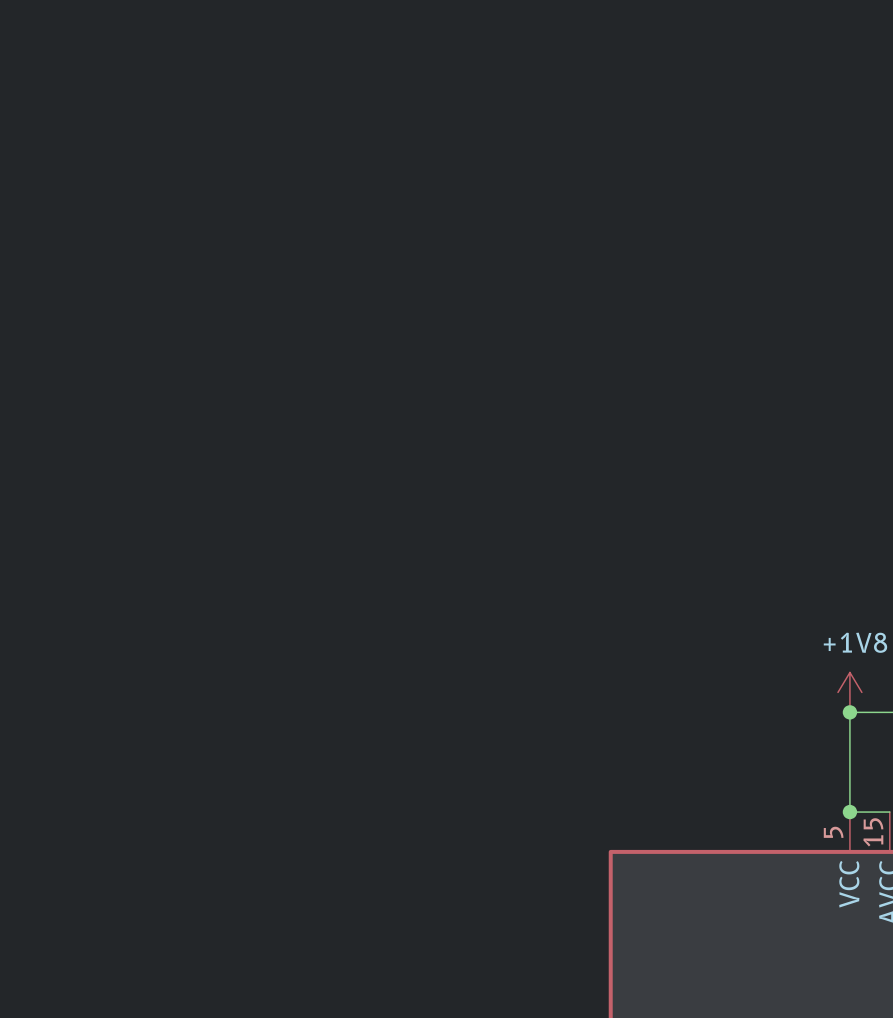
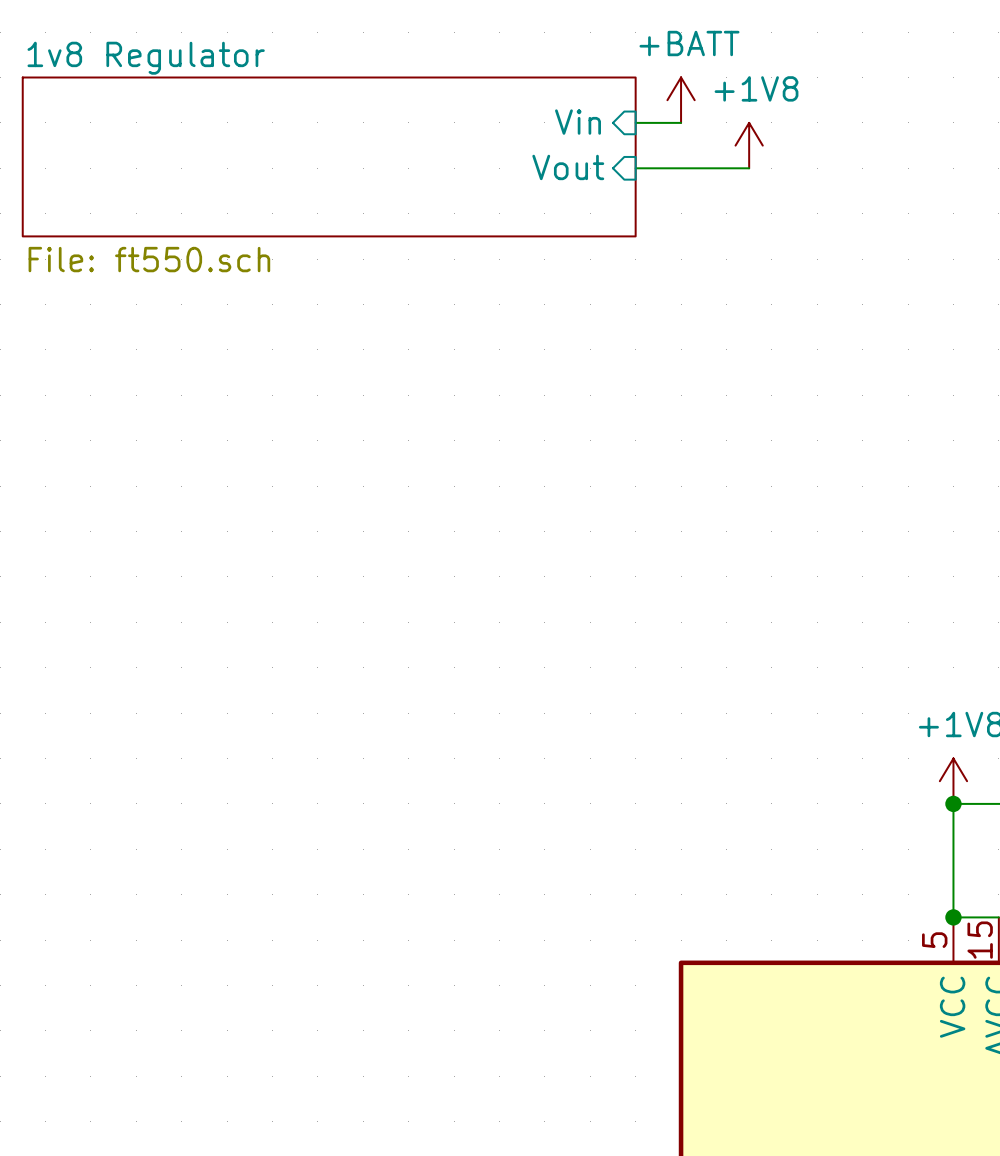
power symbol: none -> +BATT (681, 100)
sheet pin: none -> Vin (578, 122)
wire: none -> (635, 122) (681, 122)
power symbol: none -> +1V8 (749, 145)
sheet 1v8 Regulator: none -> File: ft550.sch (329, 156)
sheet pin: none -> Vout (568, 167)
wire: none -> (635, 168) (749, 168)

